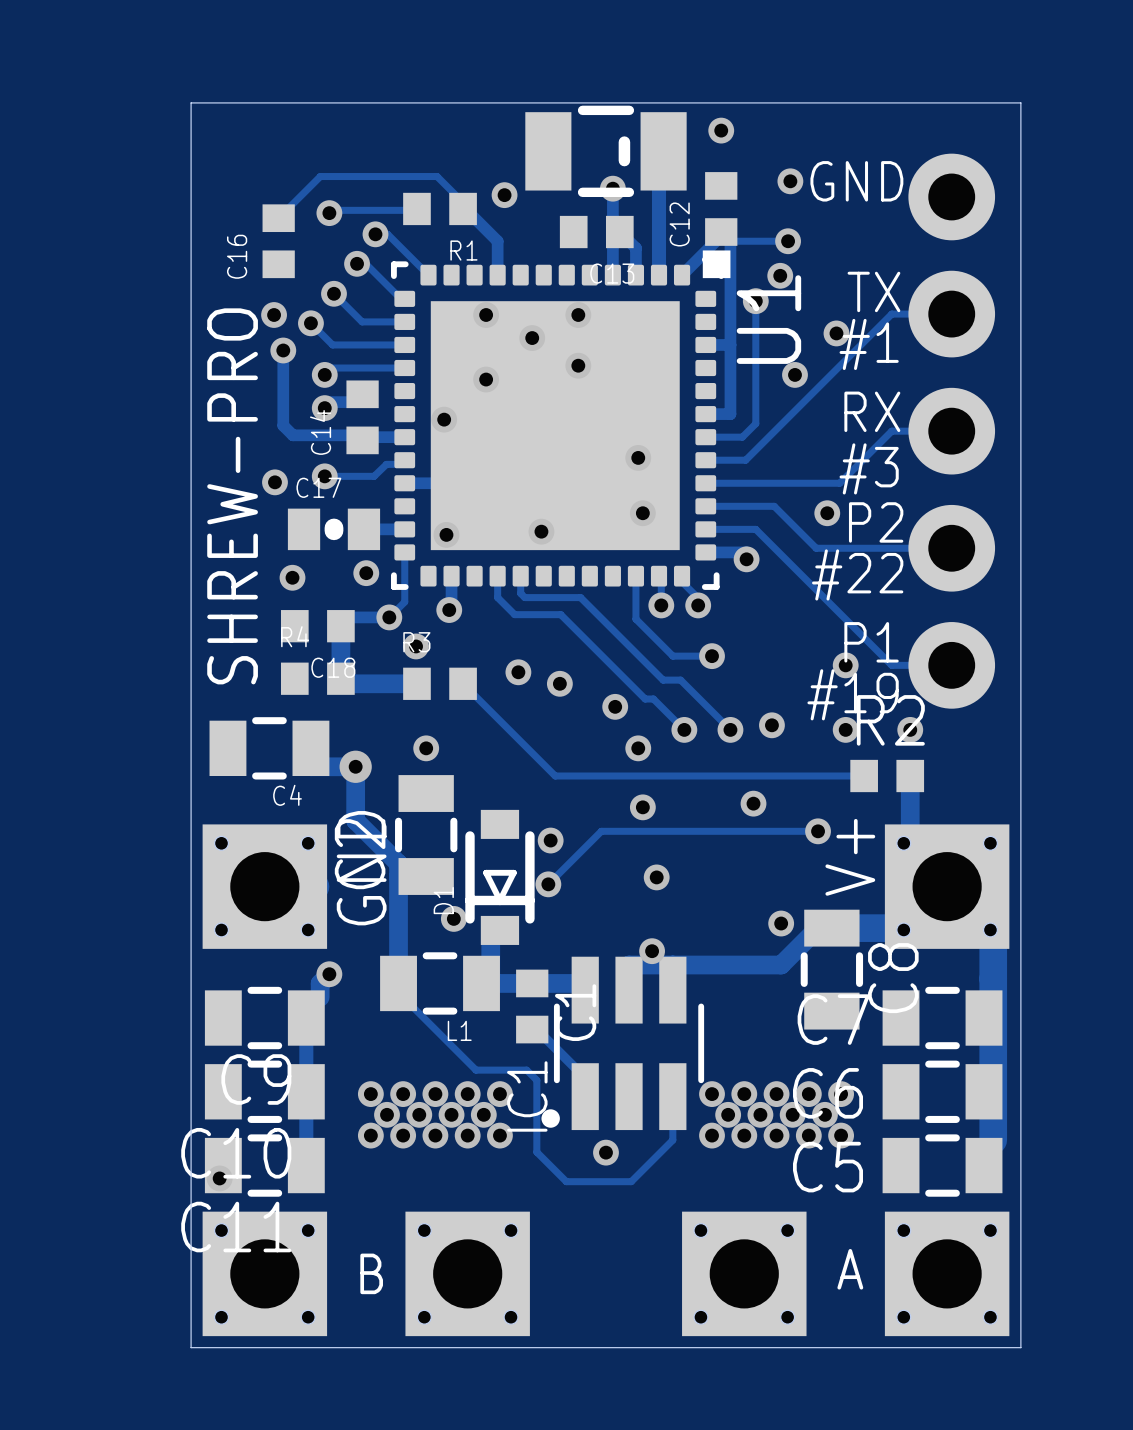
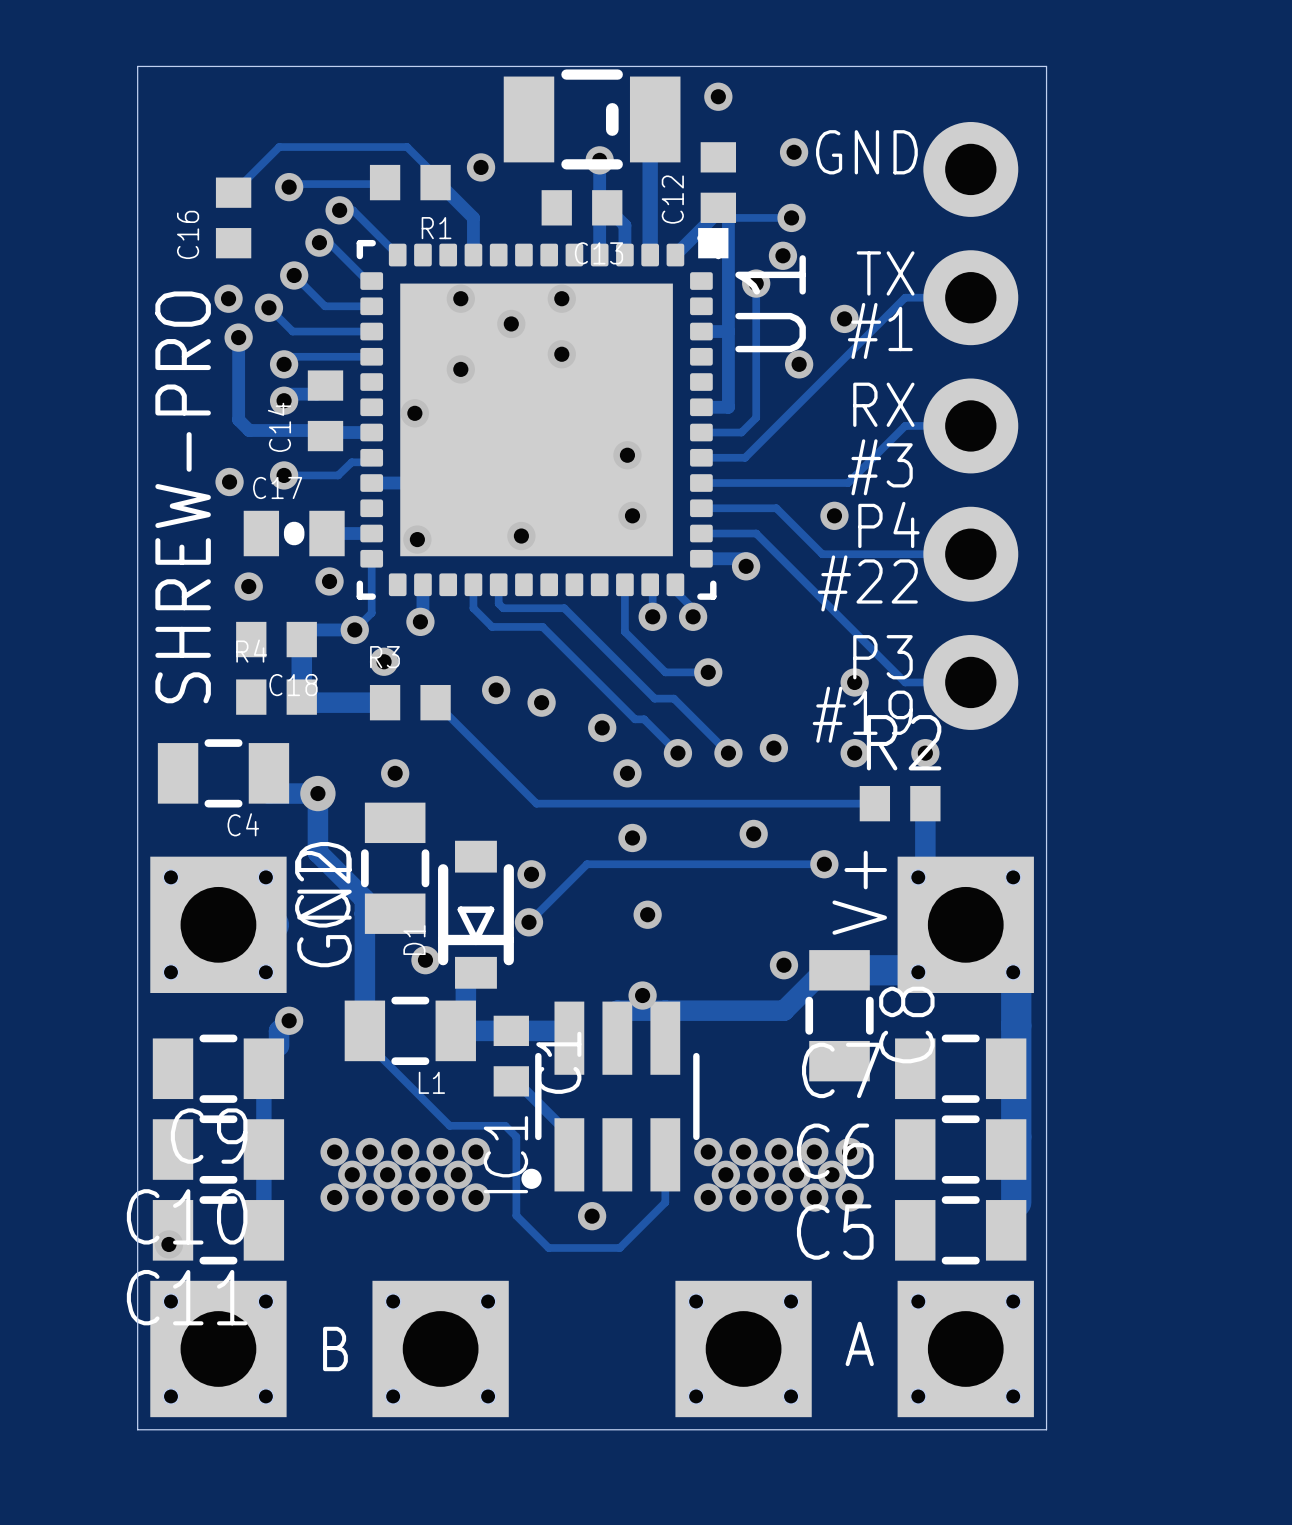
text: P2 (876, 522) -> P4 (888, 524)
text: P1 (871, 642) -> P3 (882, 657)

